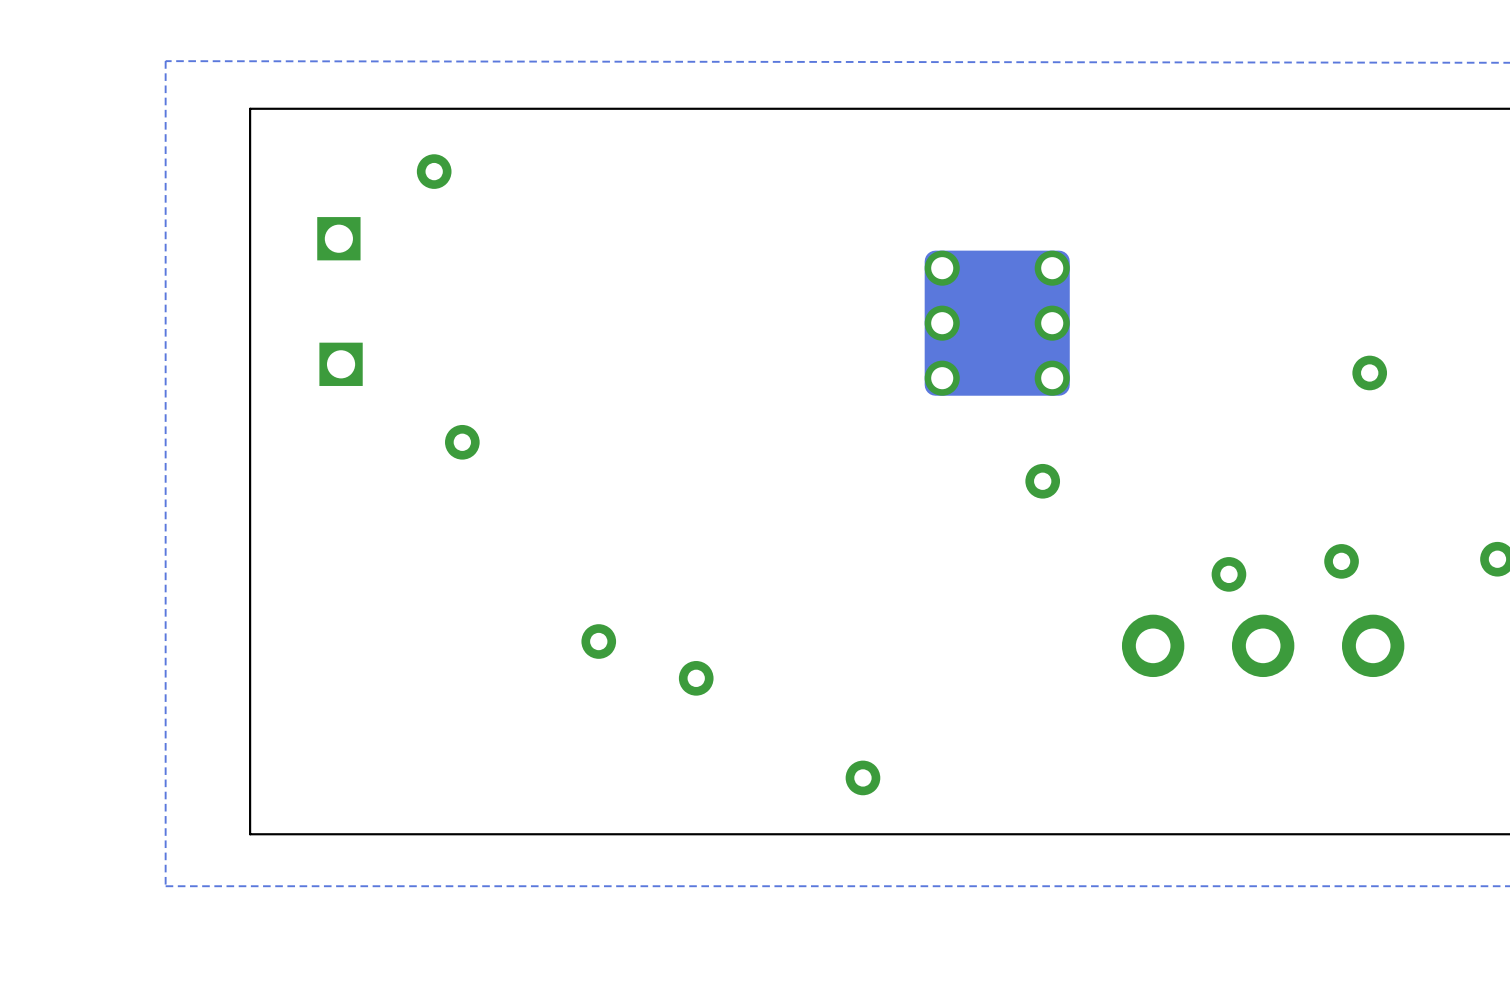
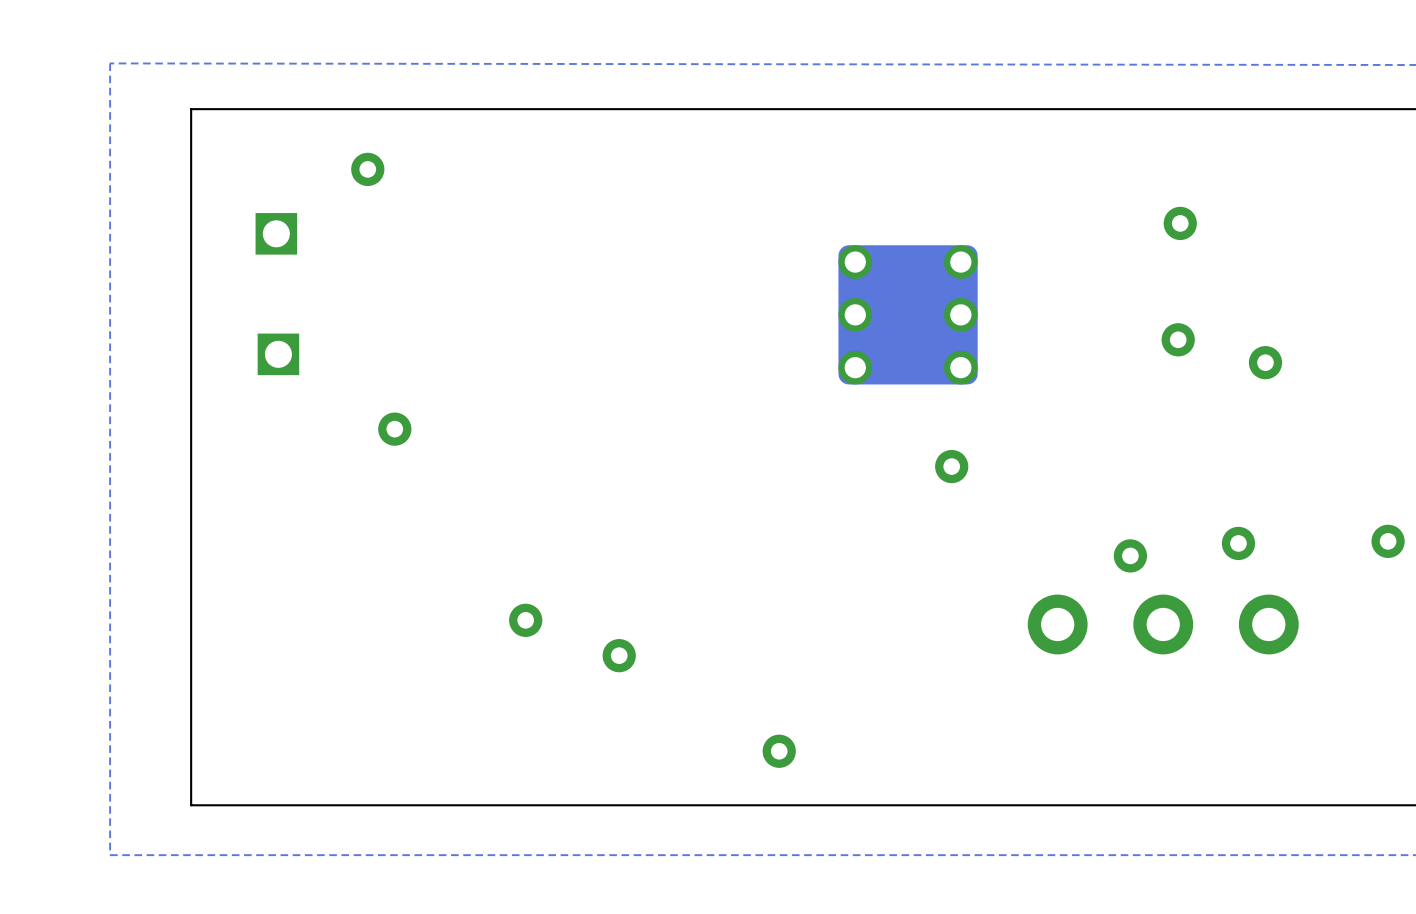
via: none -> (1180, 223)
via: none -> (1178, 339)

